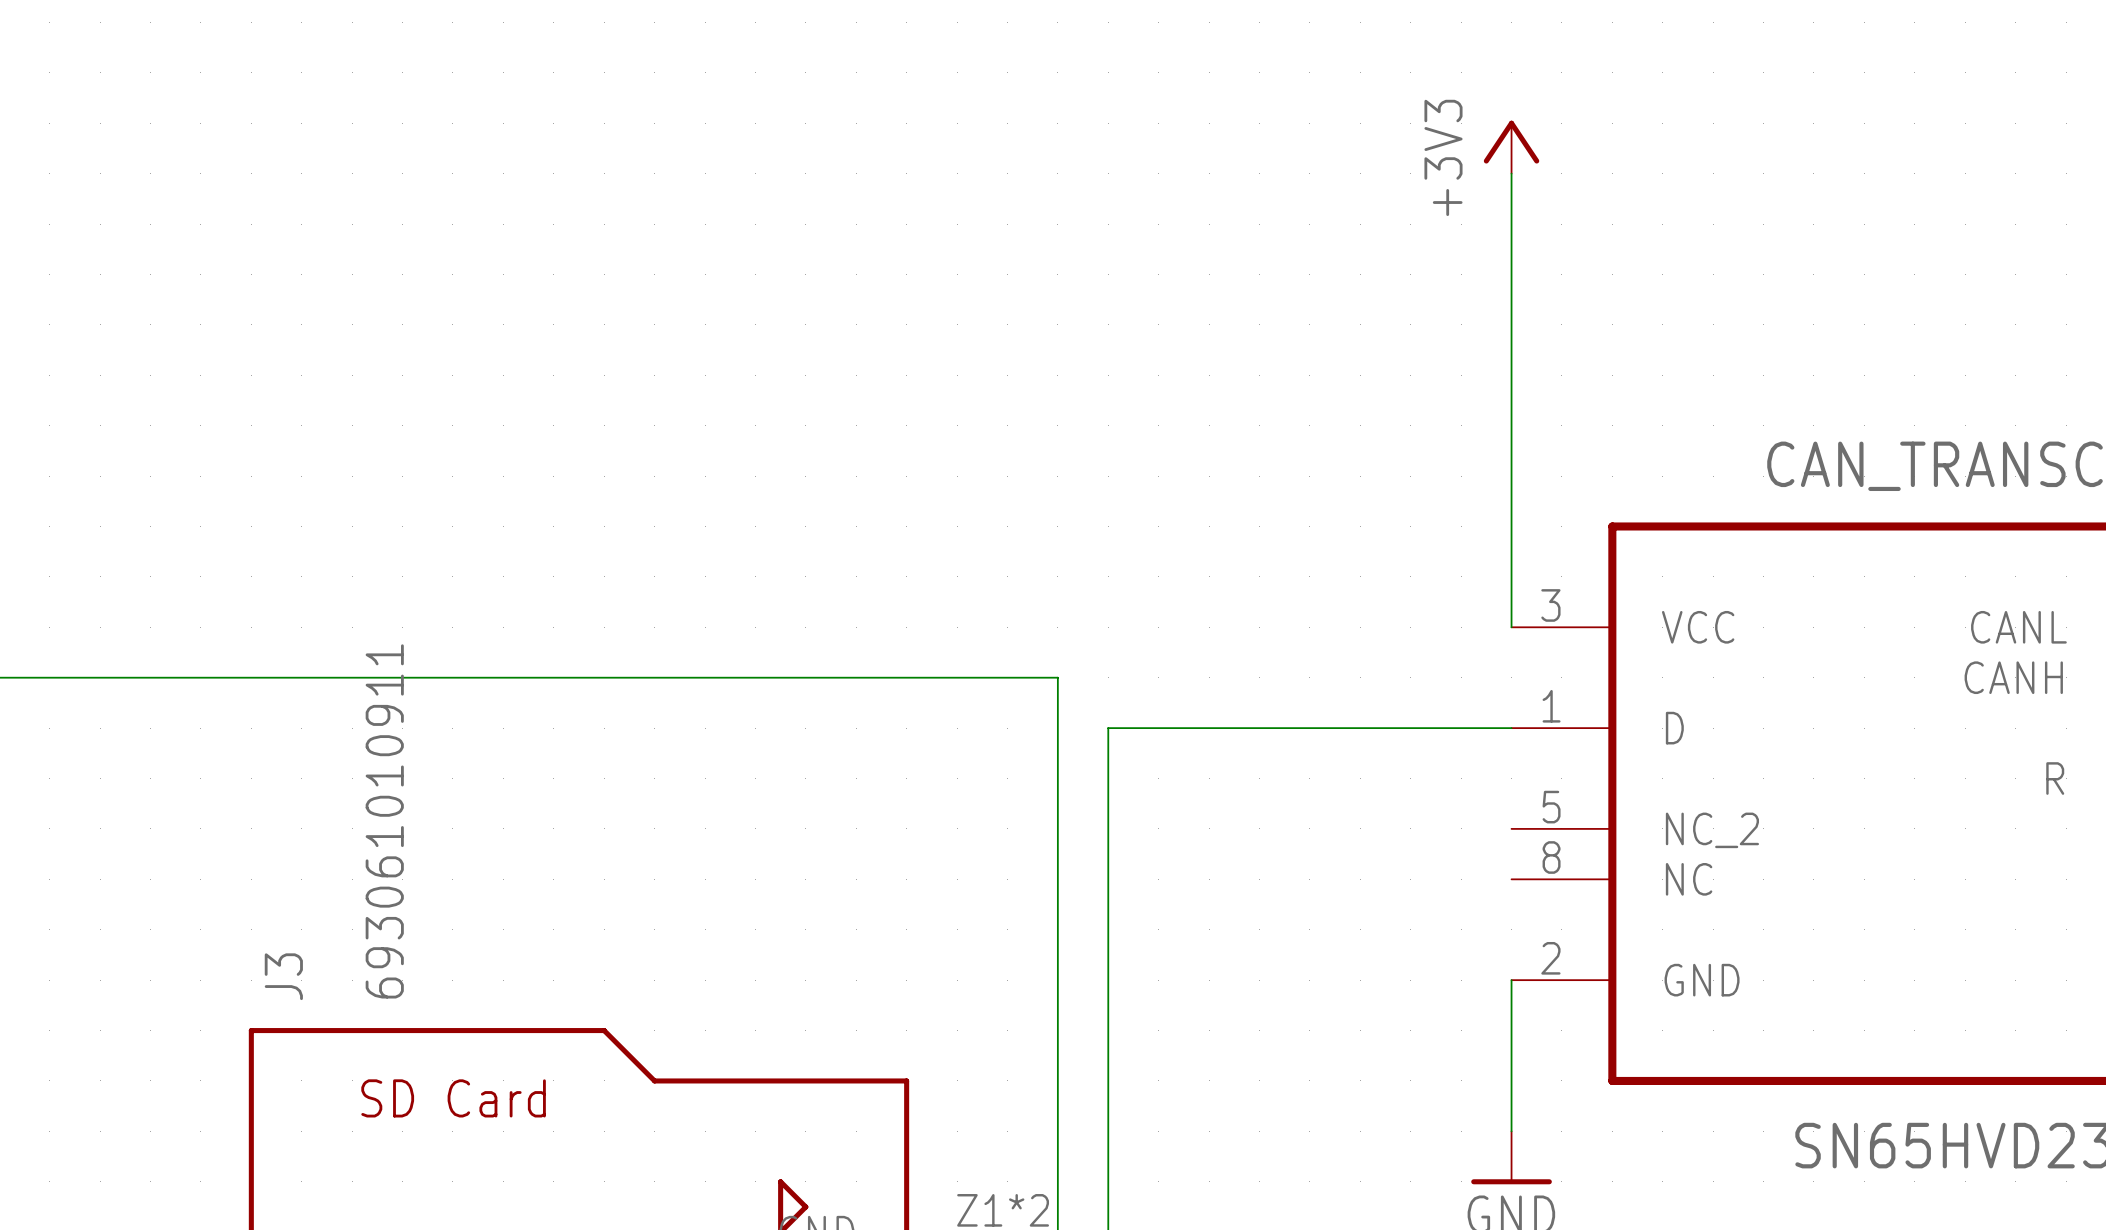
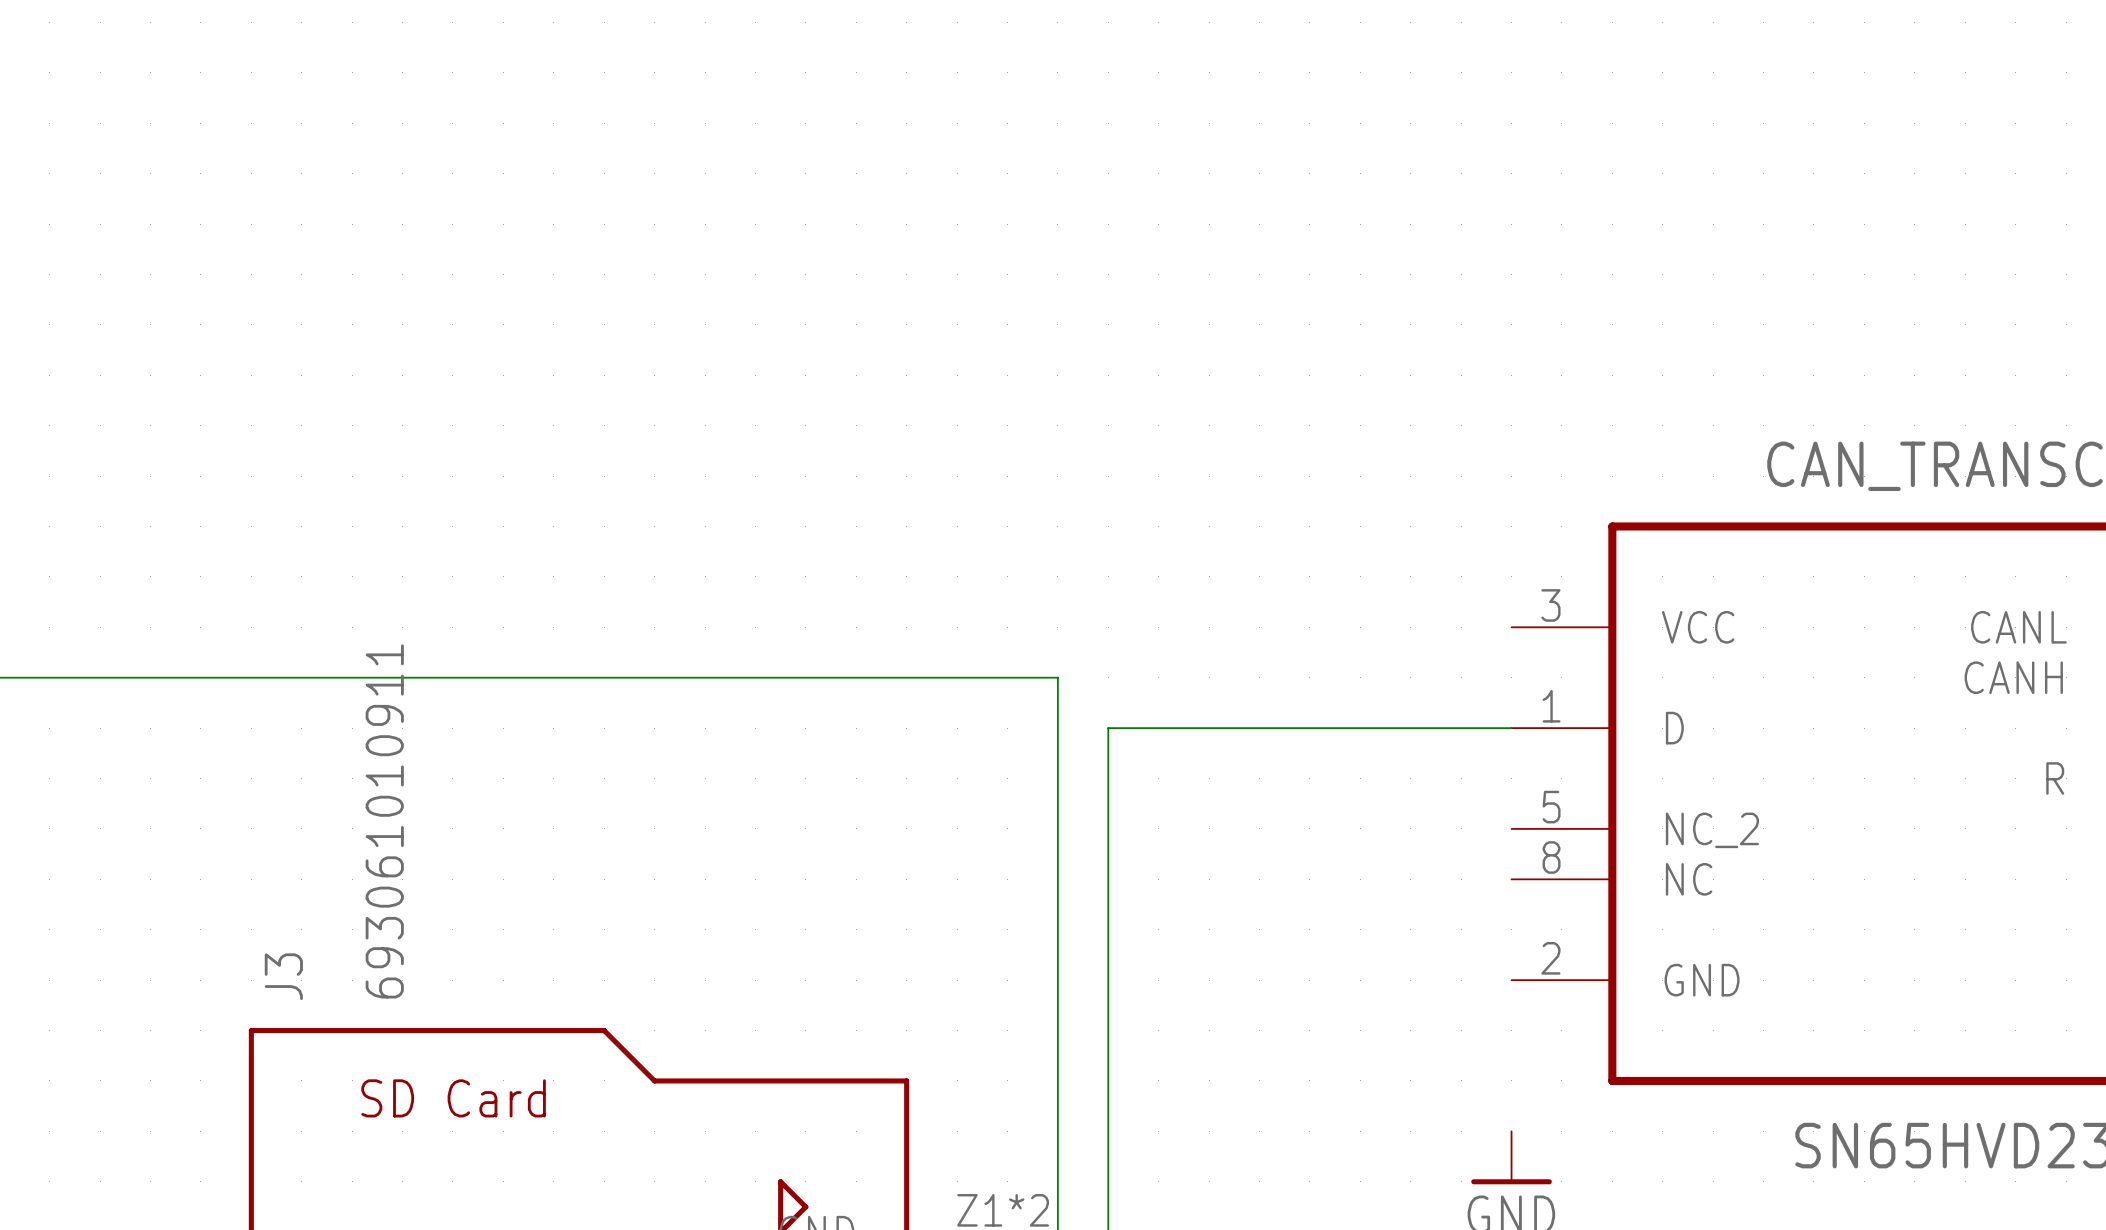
power symbol: +3V3 (1511, 147) -> none
wire: (1511, 173) (1511, 627) -> none
wire: (1511, 980) (1511, 1131) -> none

